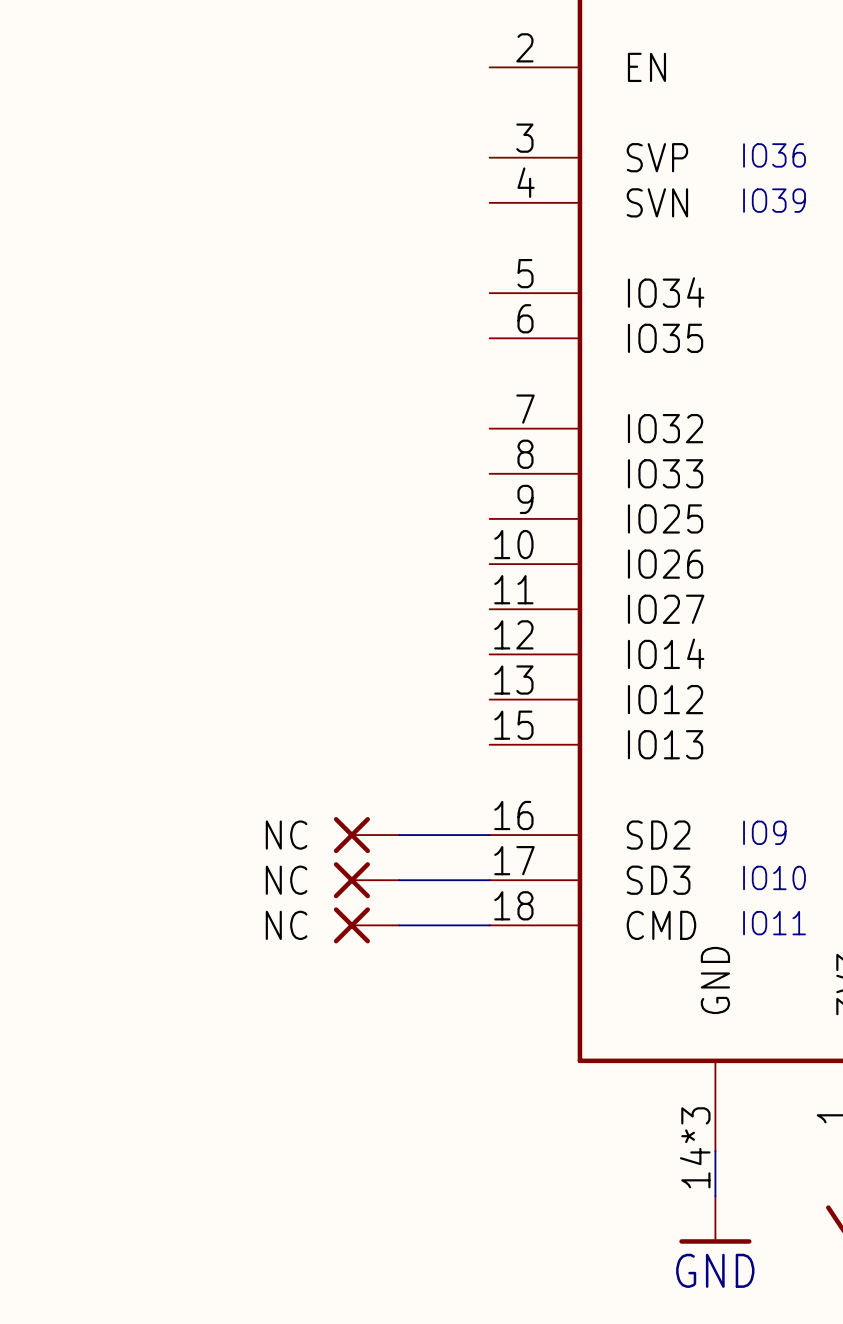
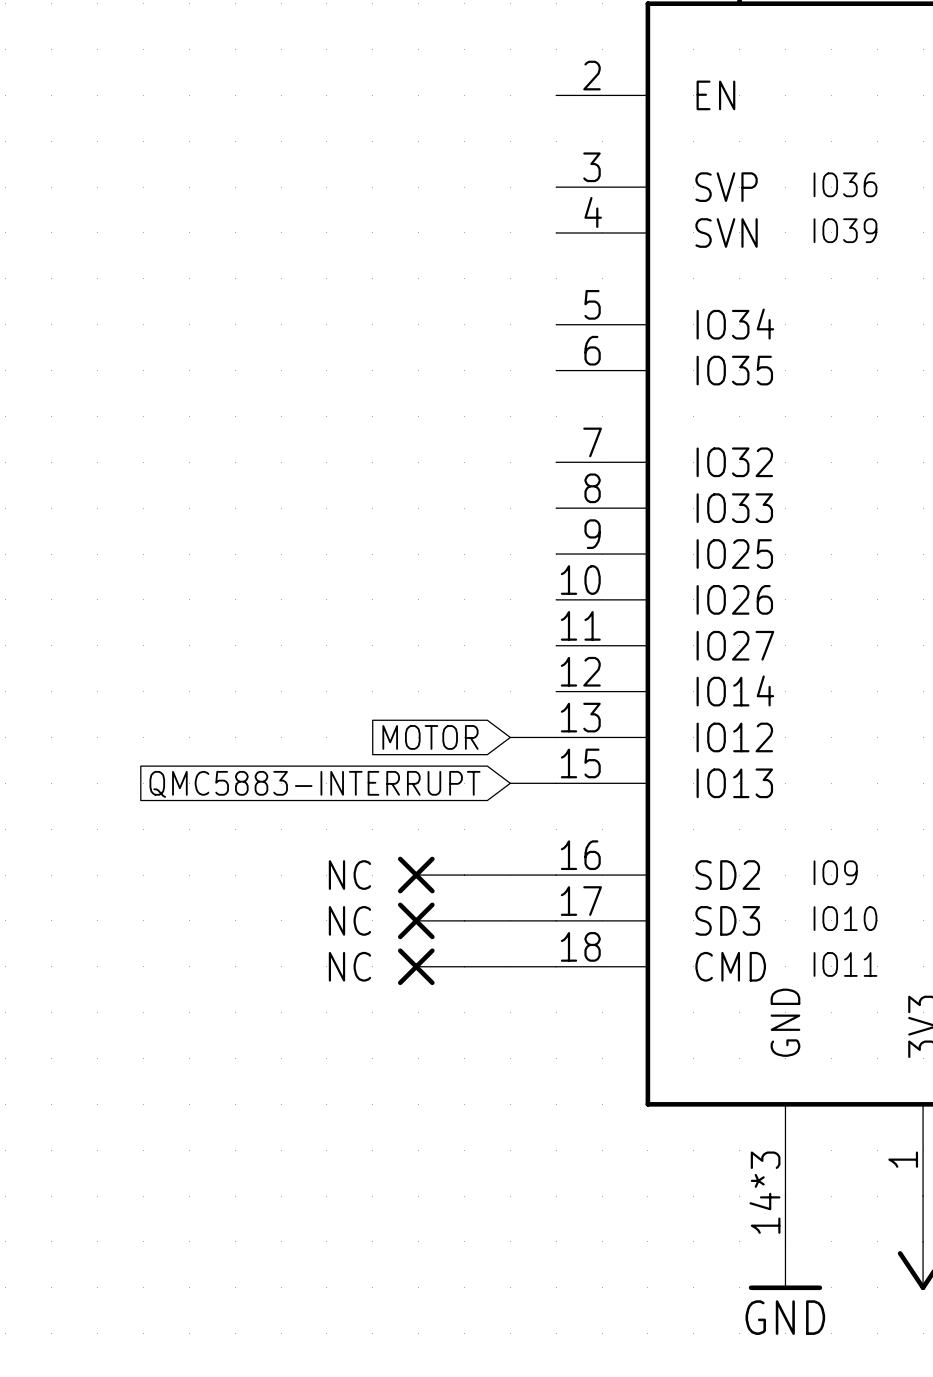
global label: none -> MOTOR (430, 737)
wire: none -> (510, 737) (556, 737)
wire: none -> (510, 783) (556, 783)
global label: none -> QMC5883-INTERRUPT (315, 784)

